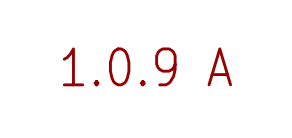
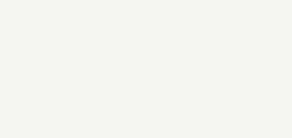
text: 1.0.9 A (147, 66) -> none

